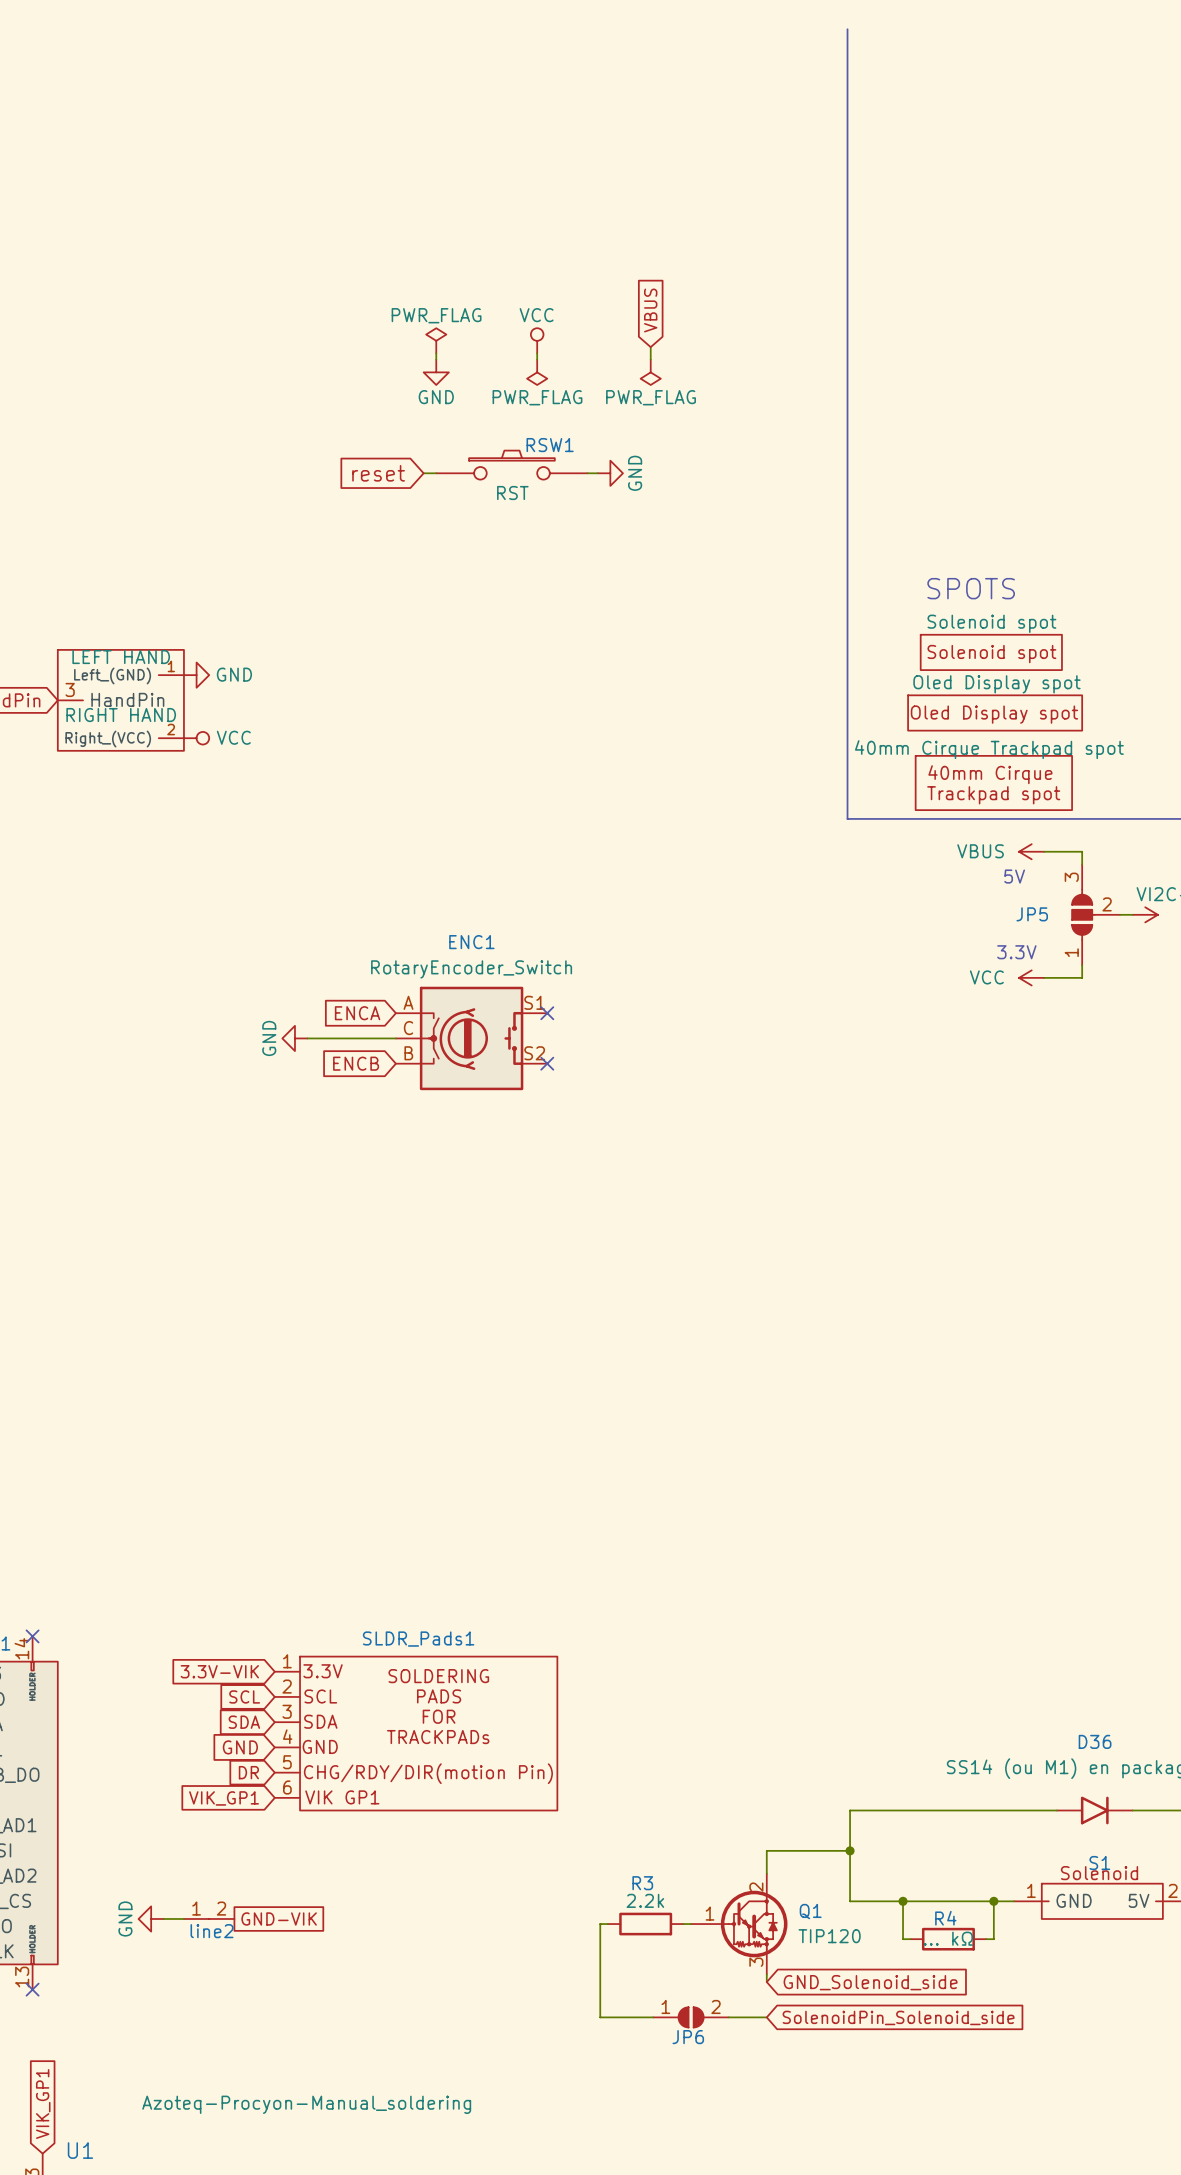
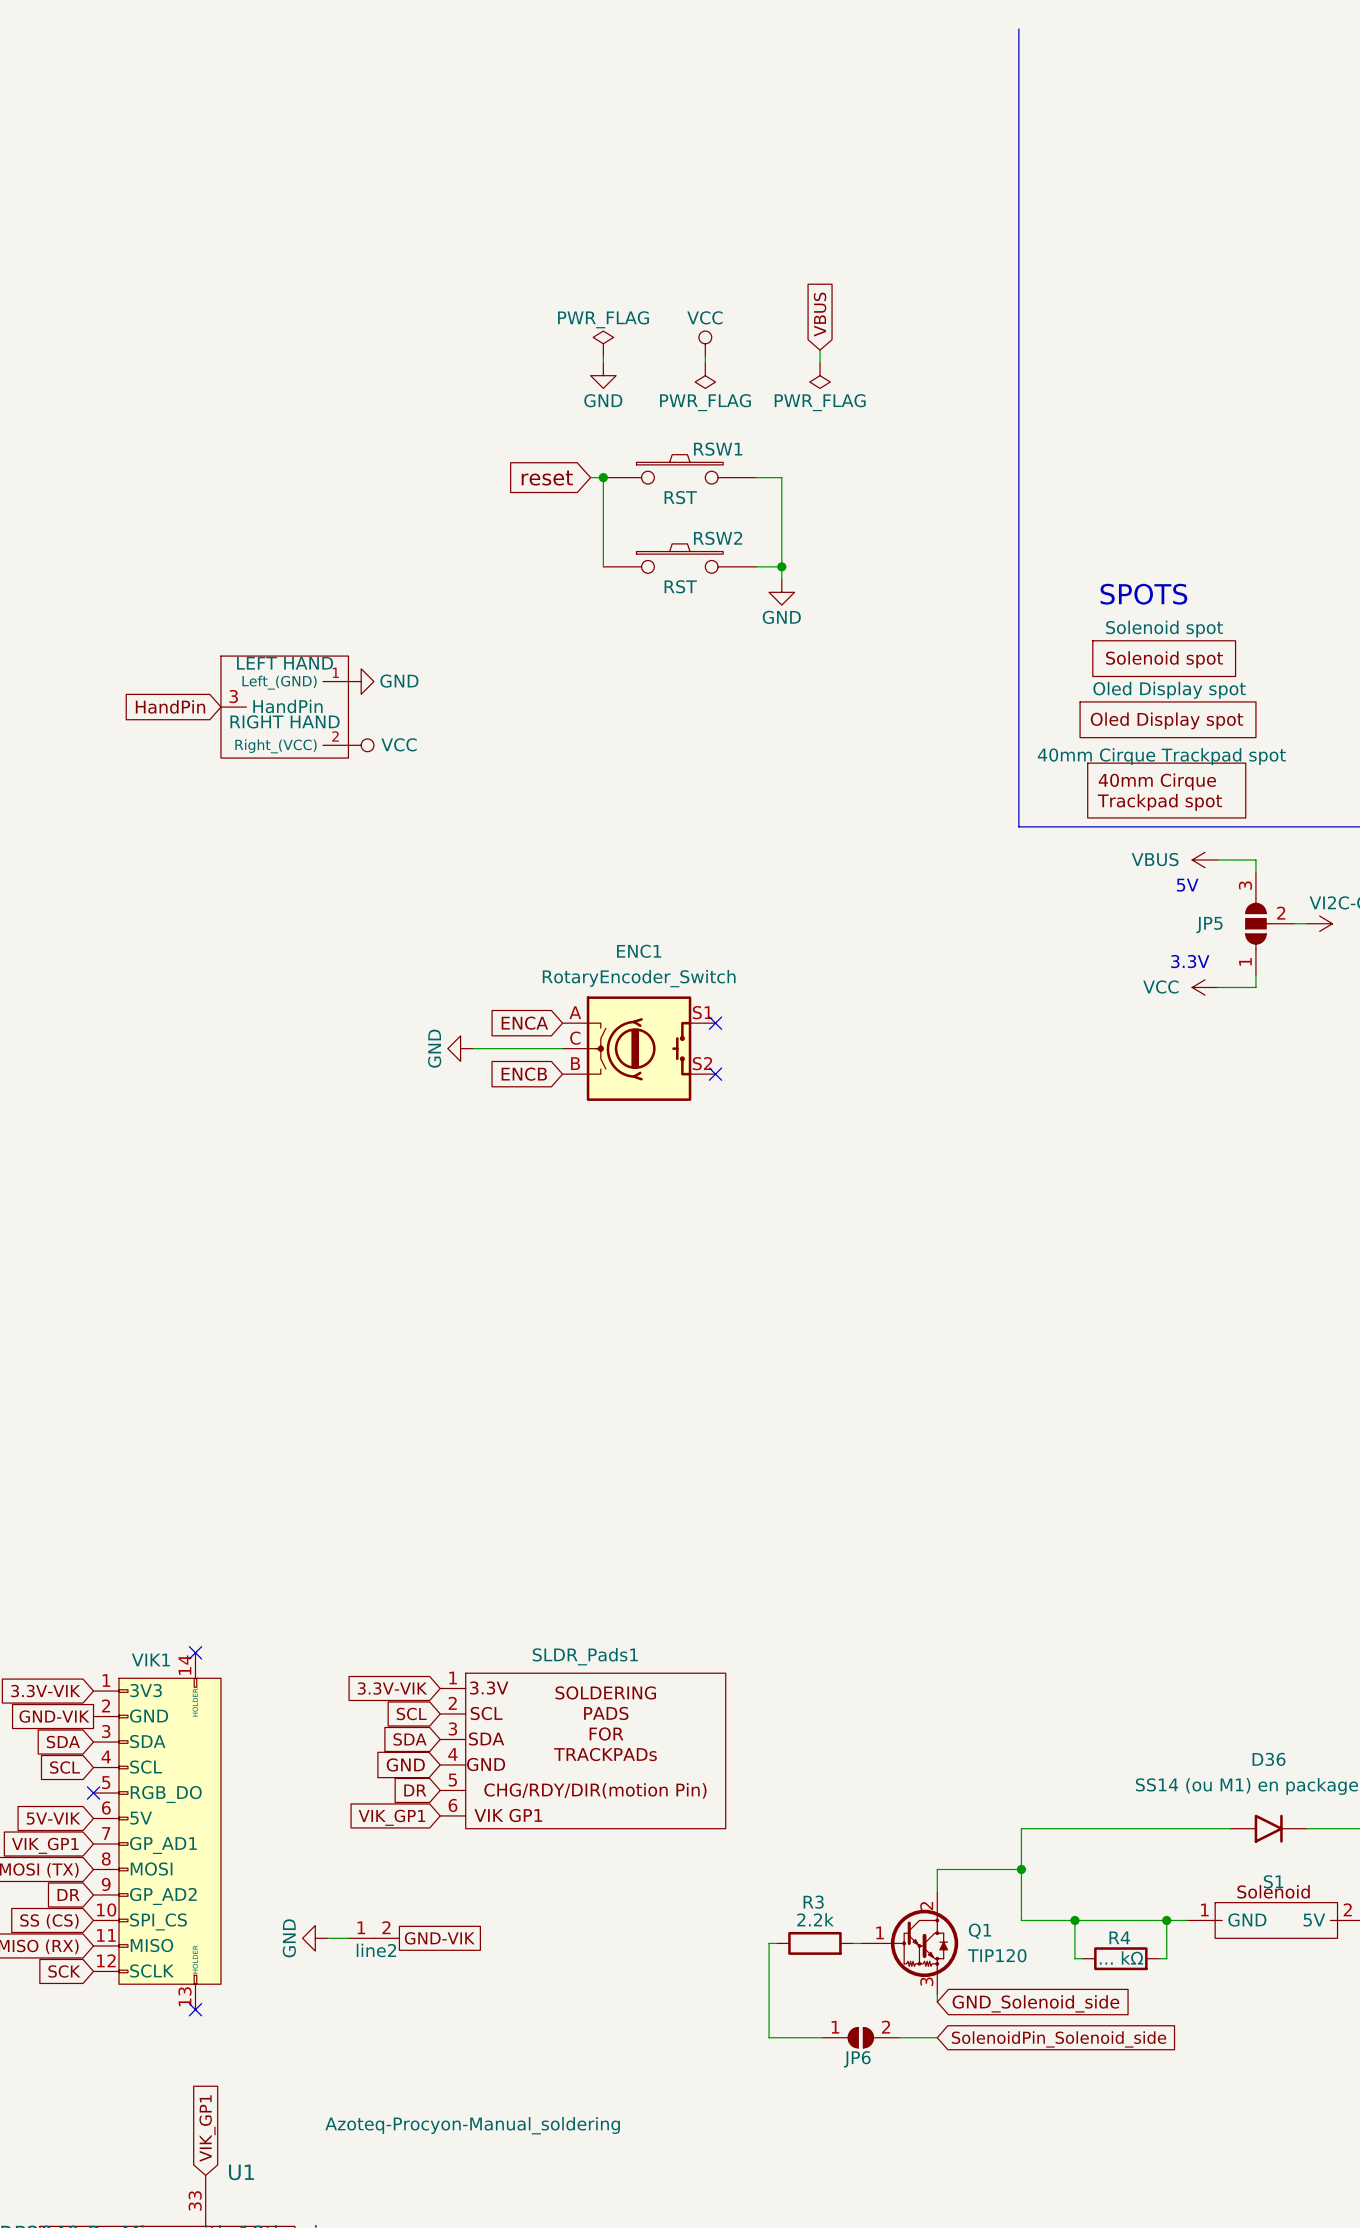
wire: none -> (603, 477) (603, 566)
junction: none -> (603, 477)
wire: none -> (766, 477) (781, 477) (781, 579)
power symbol rotation: 0° (610, 473) -> 90° clockwise (781, 592)
power symbol position: GND (610, 473) -> GND (781, 592)
RSW2: none -> RST (679, 558)
wire: none -> (756, 566) (781, 566)
junction: none -> (781, 566)

